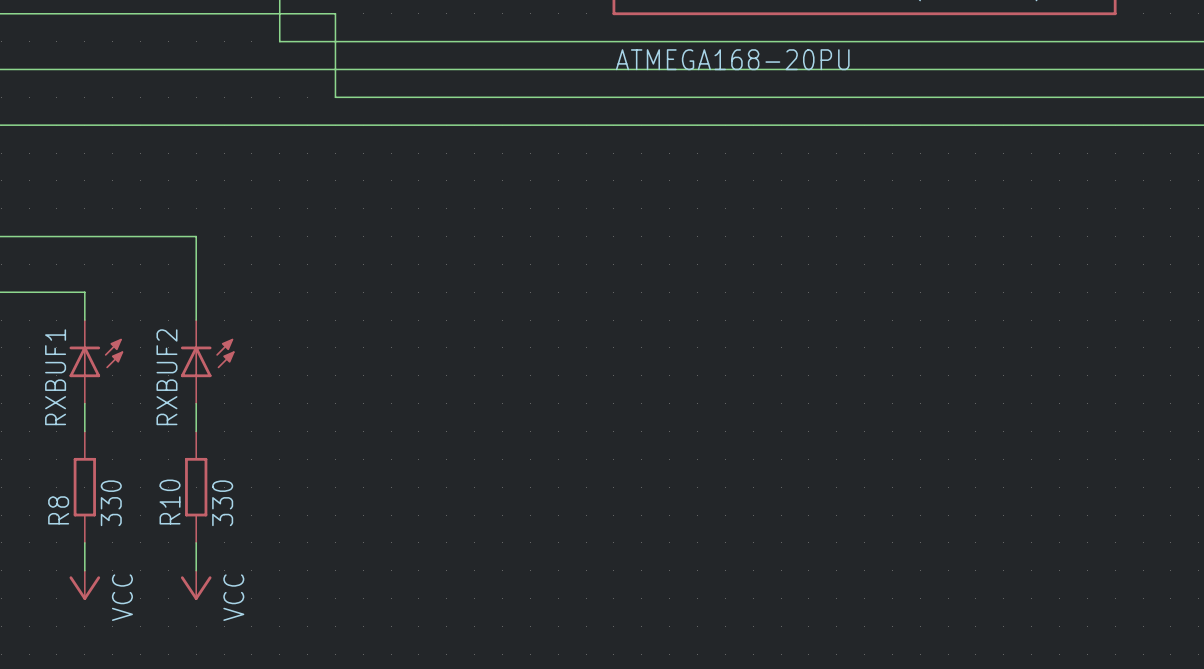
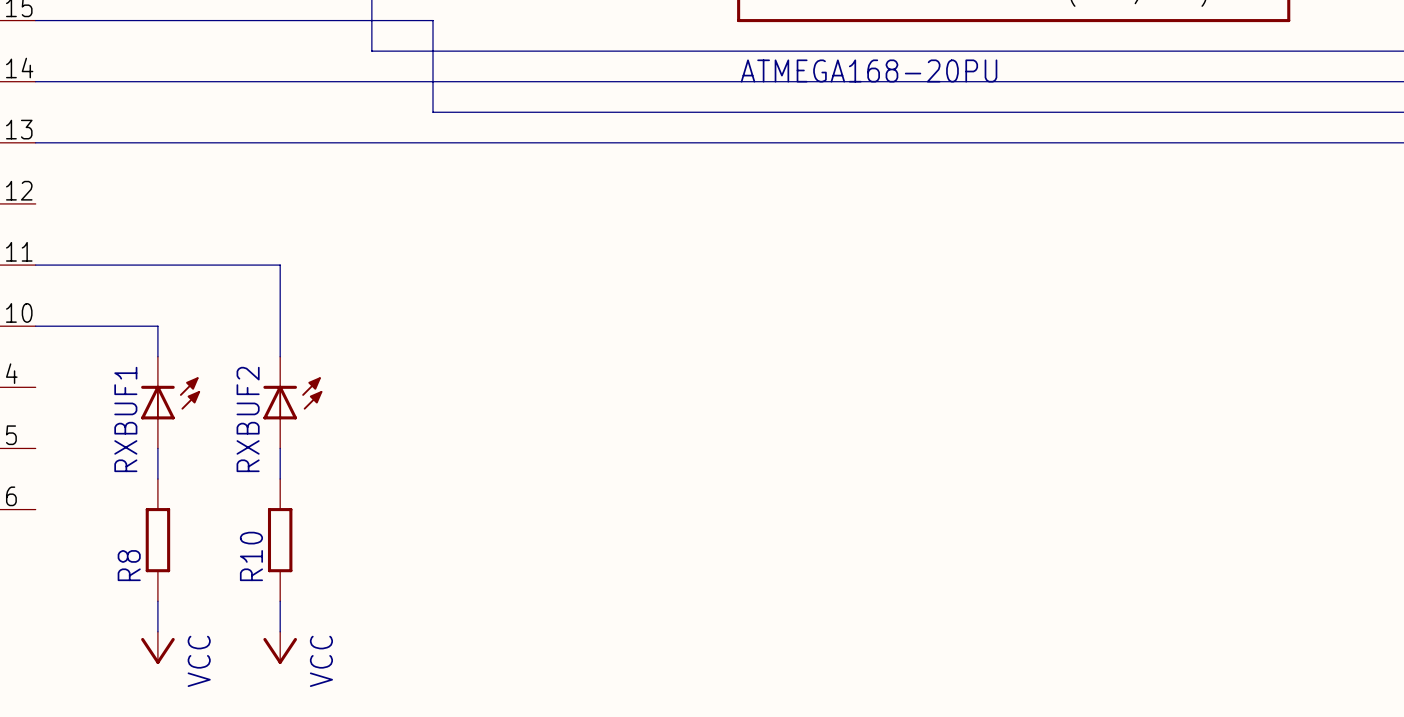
R8 value: 330 (111, 503) -> none
R10 value: 330 (222, 503) -> none

